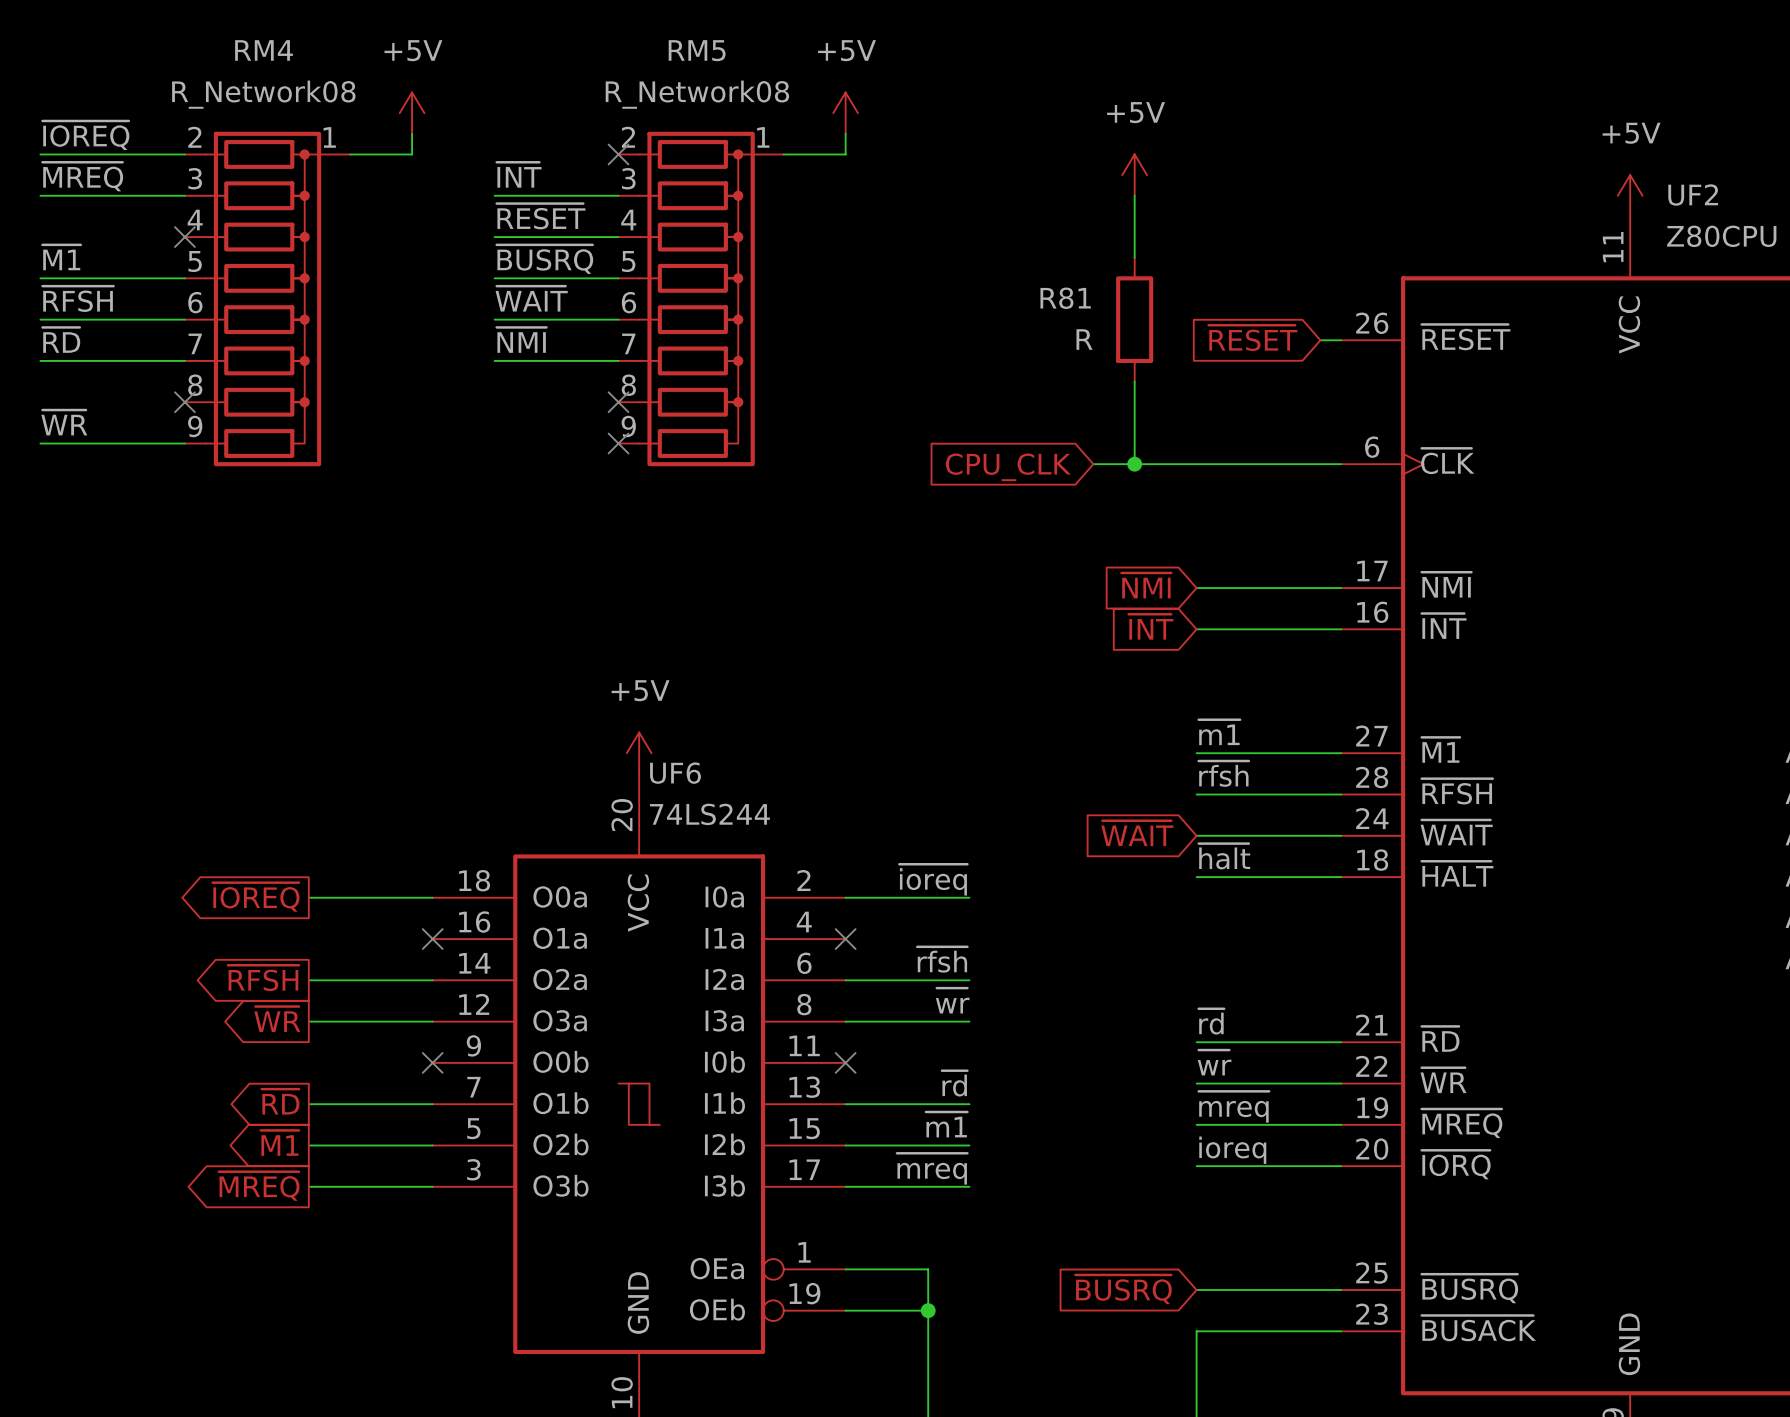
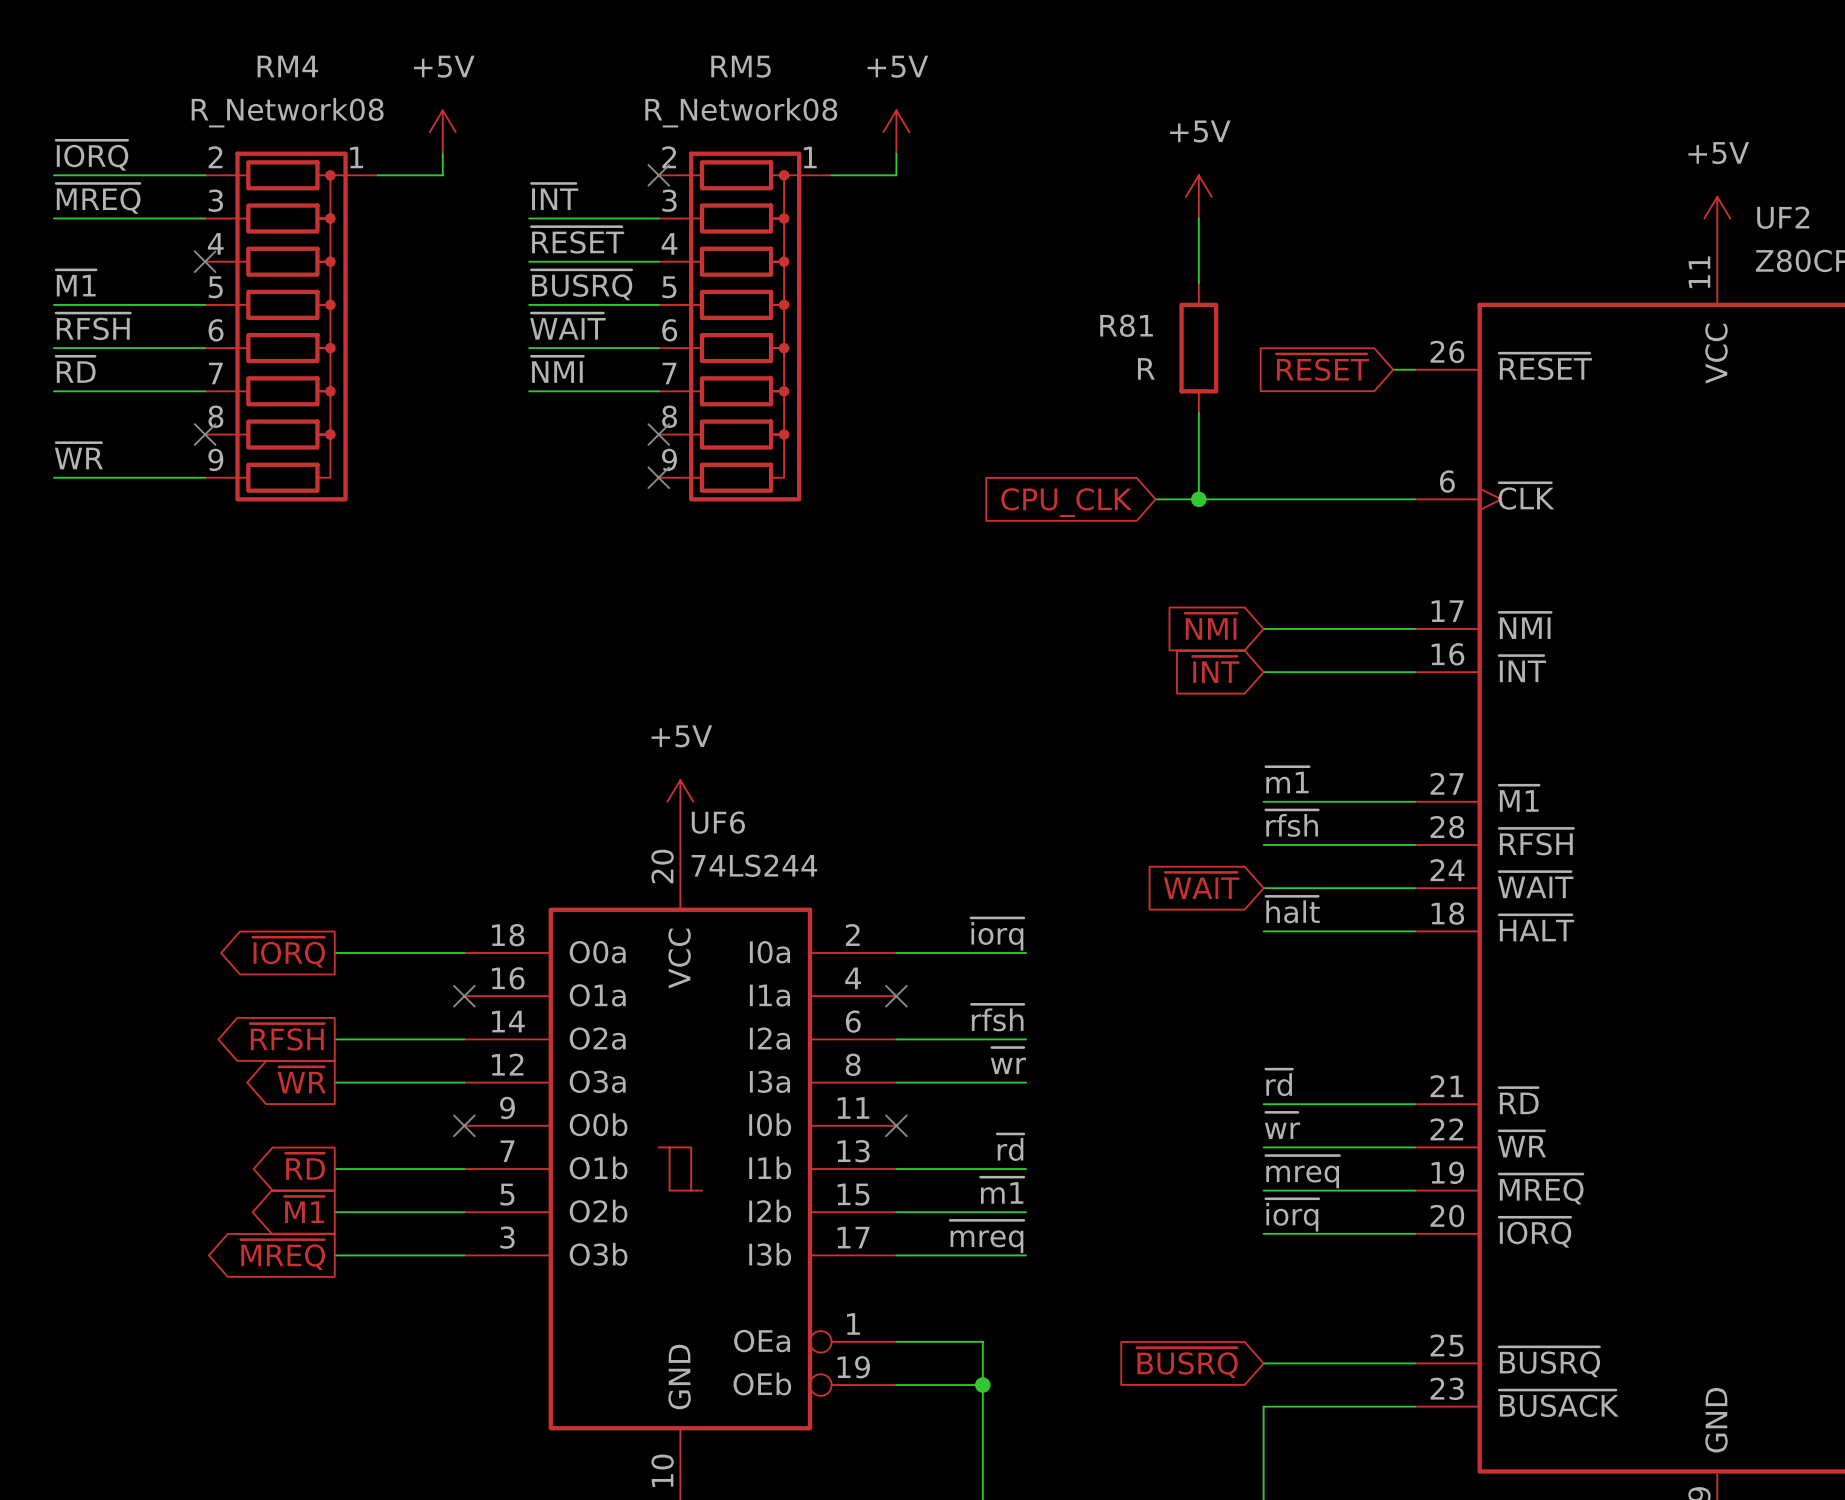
label: ~{IOREQ} (85, 135) -> ~{IORQ} (92, 155)
label: ~{ioreq} (933, 879) -> ~{iorq} (997, 934)
global label: ~{IOREQ} (256, 897) -> ~{IORQ} (288, 952)
label: ioreq (1232, 1150) -> ~{iorq} (1292, 1215)

